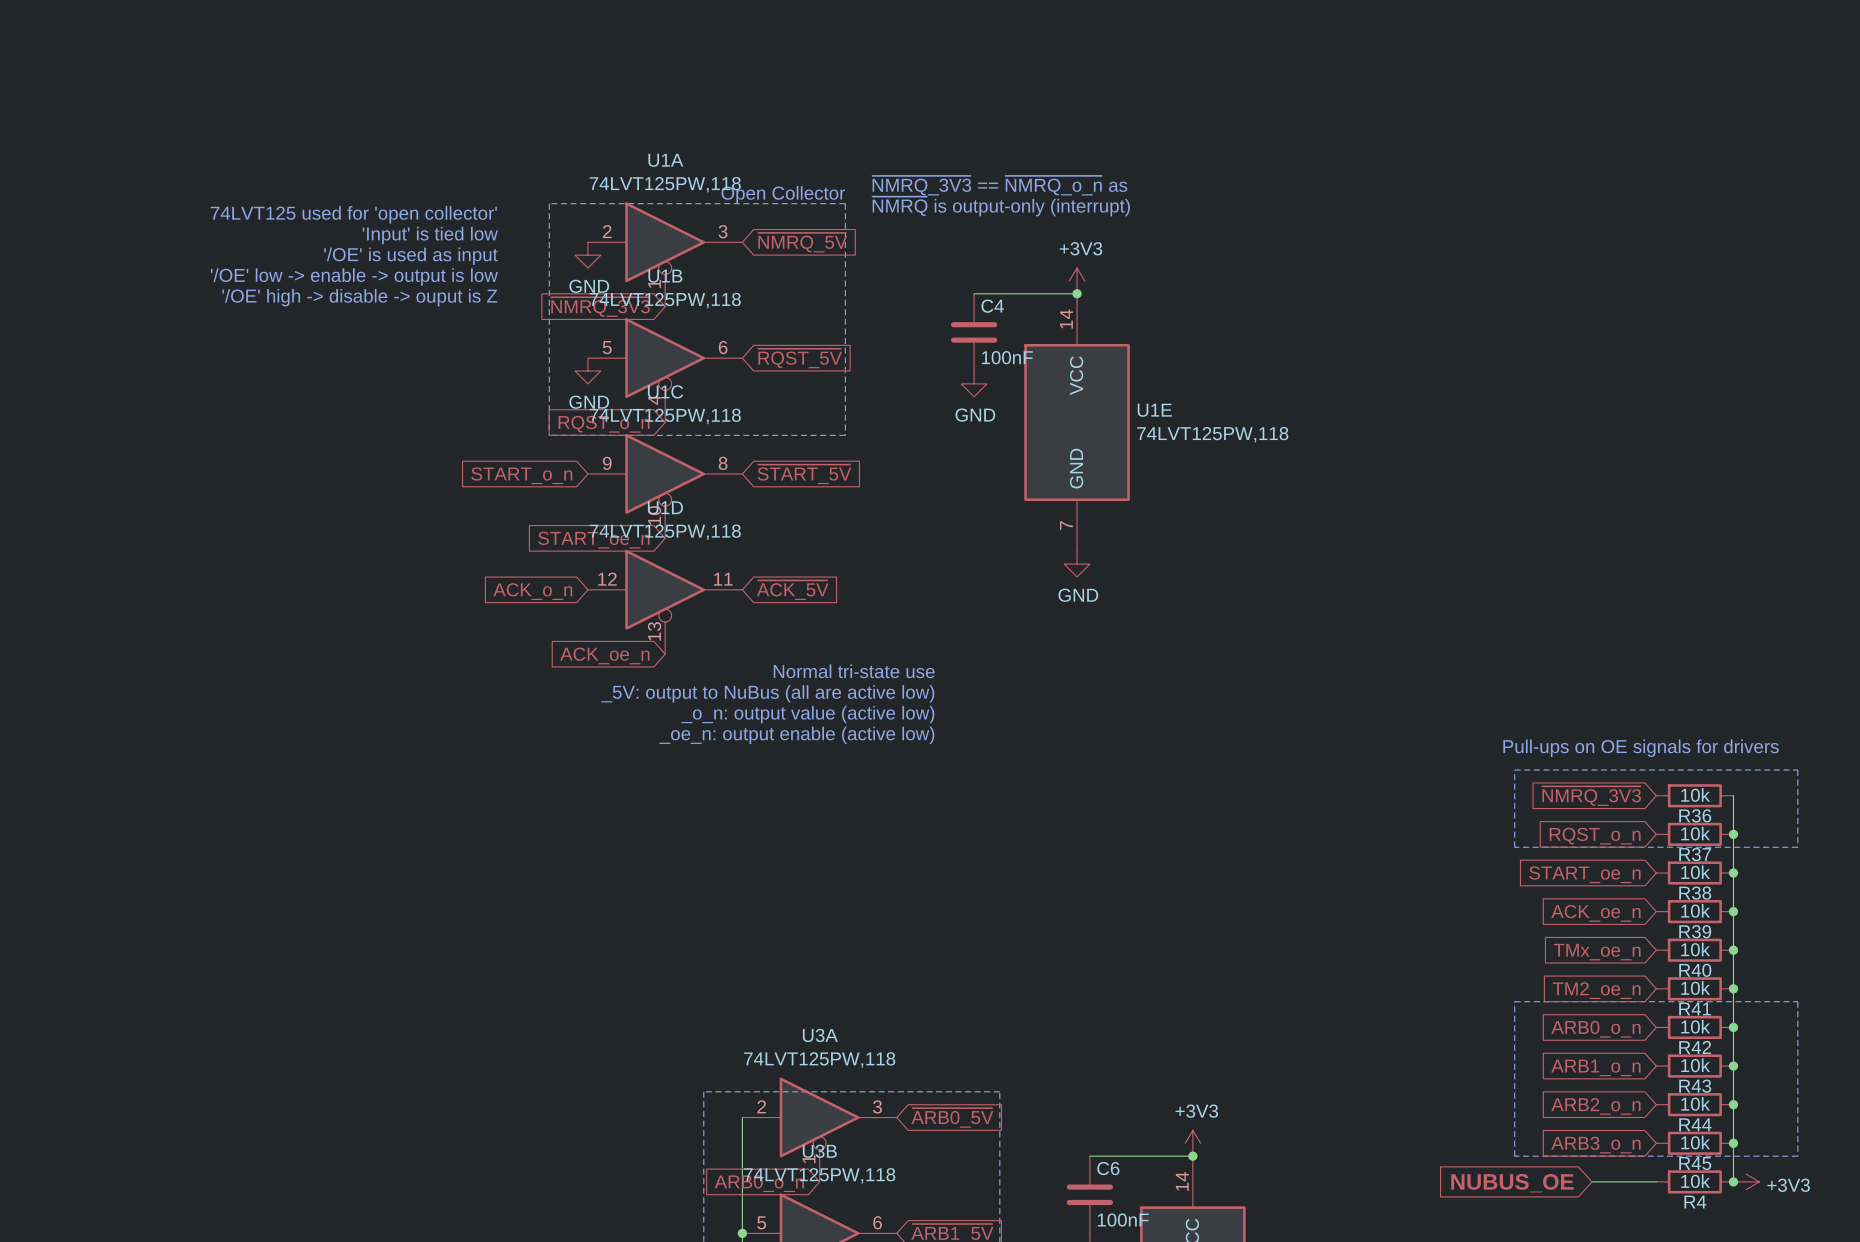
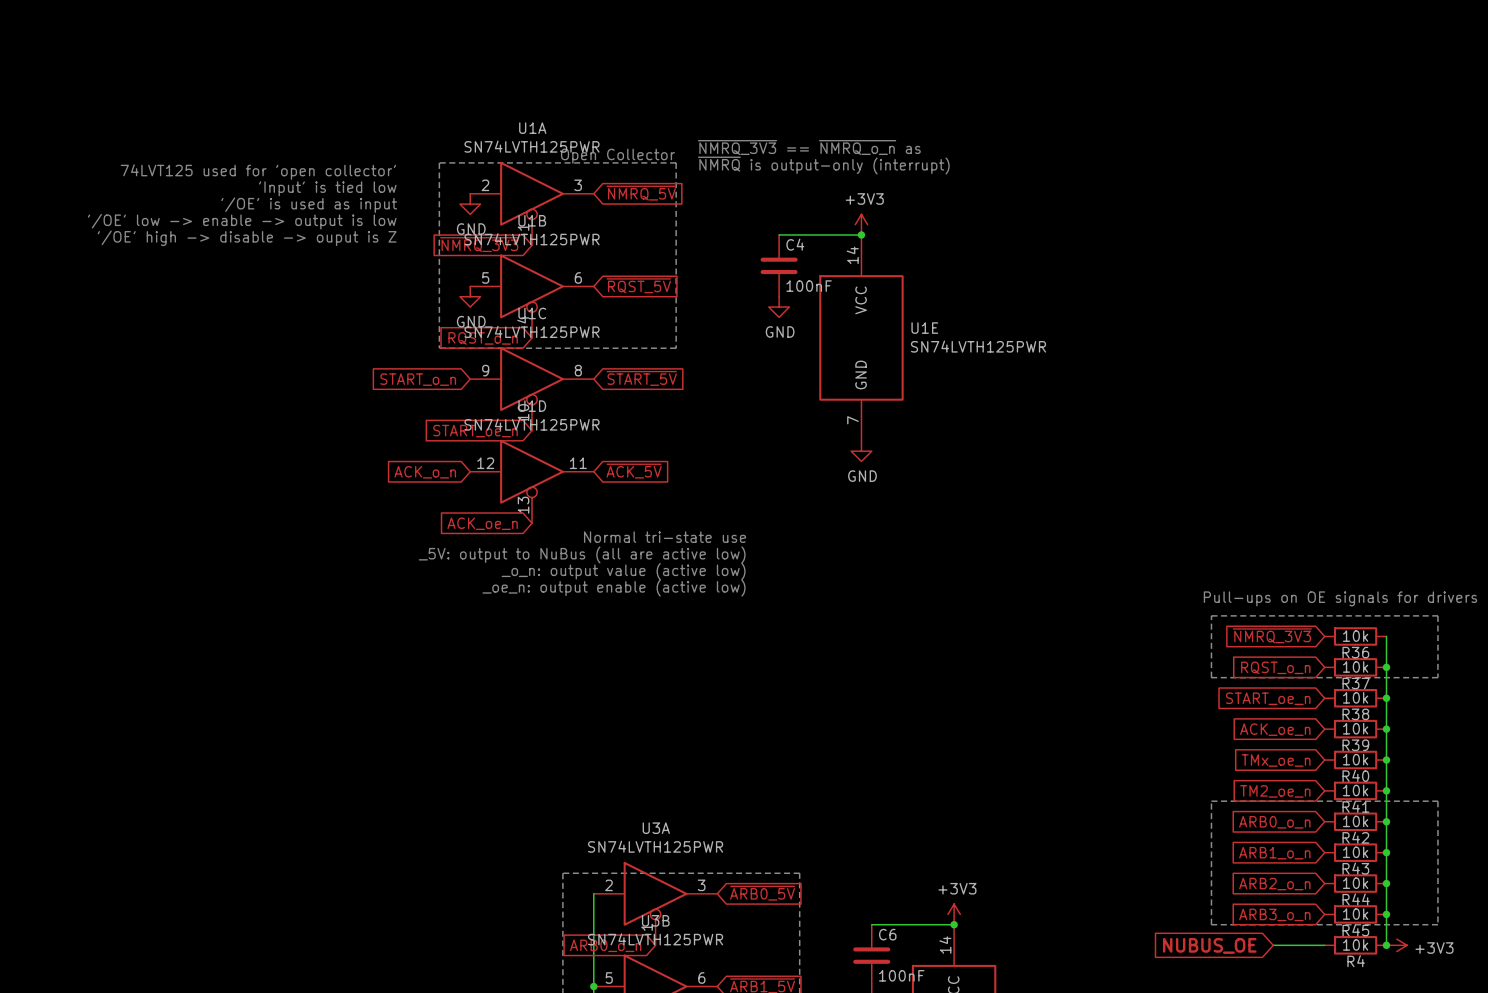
U1A value: 74LVT125PW,118 (665, 184) -> SN74LVTH125PWR (532, 146)
U1B value: 74LVT125PW,118 (665, 300) -> SN74LVTH125PWR (532, 239)
U1C value: 74LVT125PW,118 (665, 416) -> SN74LVTH125PWR (532, 331)
U1E value: 74LVT125PW,118 (1212, 434) -> SN74LVTH125PWR (978, 346)
U1D value: 74LVT125PW,118 (665, 532) -> SN74LVTH125PWR (532, 424)
U3A value: 74LVT125PW,118 (819, 1059) -> SN74LVTH125PWR (655, 846)
U3B value: 74LVT125PW,118 (819, 1175) -> SN74LVTH125PWR (655, 939)

